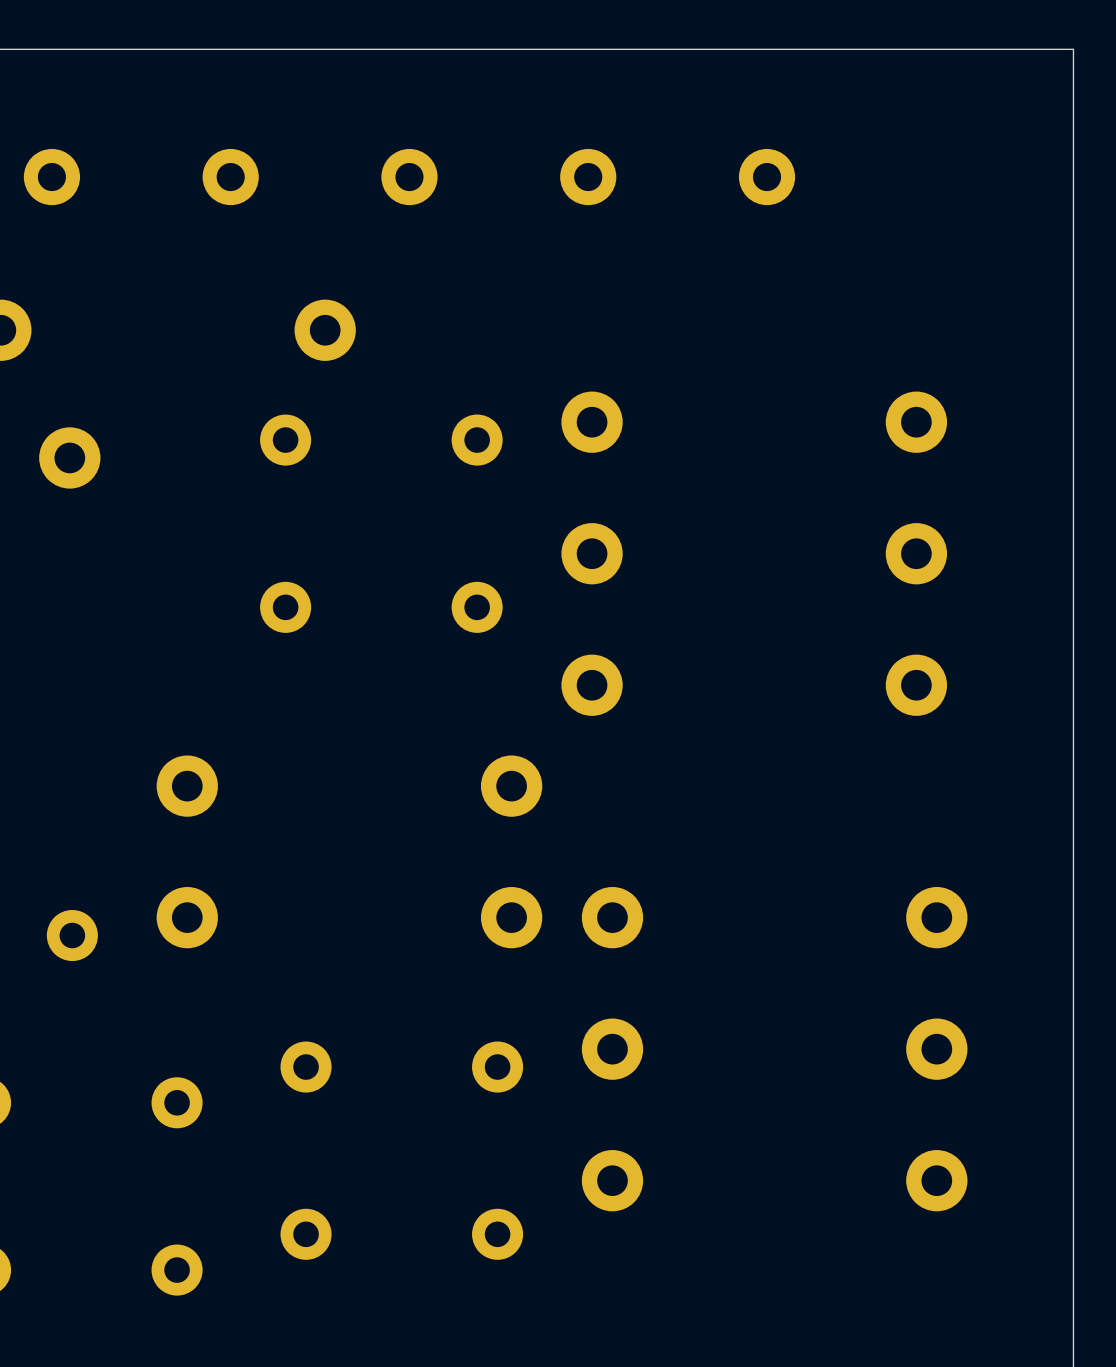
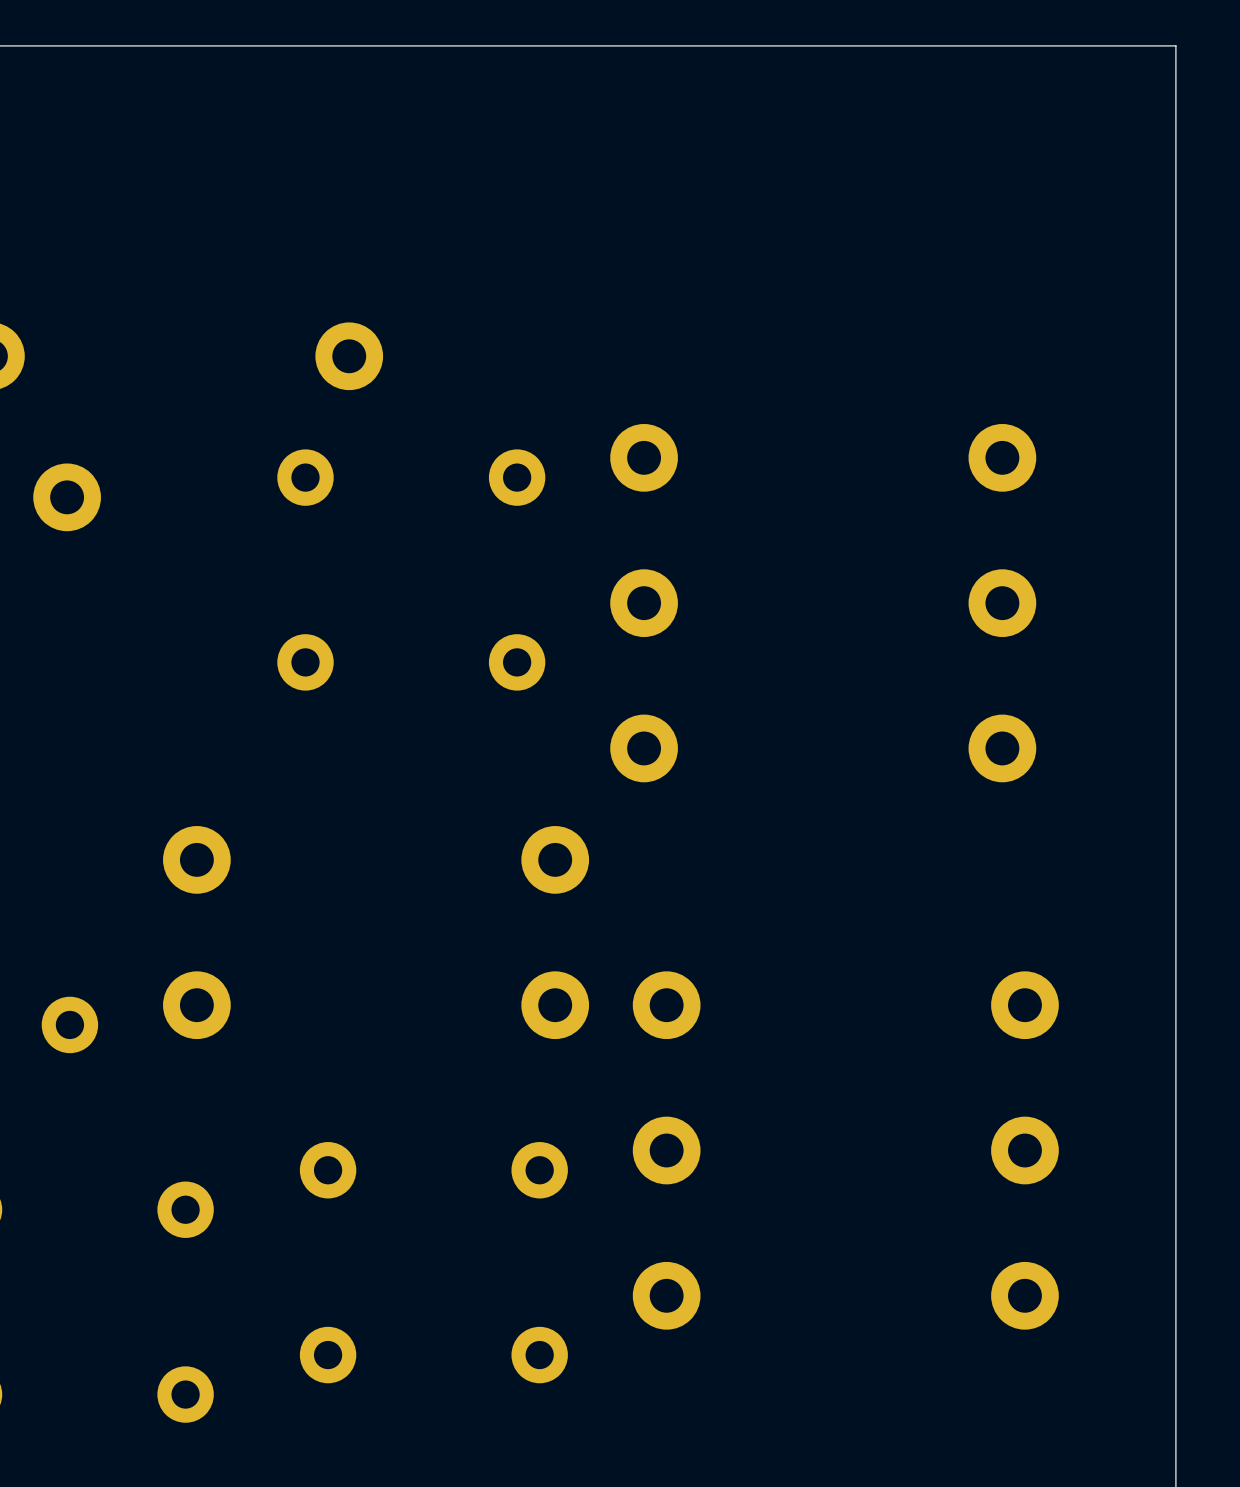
part: (51, 177) -> none
part: (230, 177) -> none
part: (409, 177) -> none
part: (588, 177) -> none
part: (767, 177) -> none

